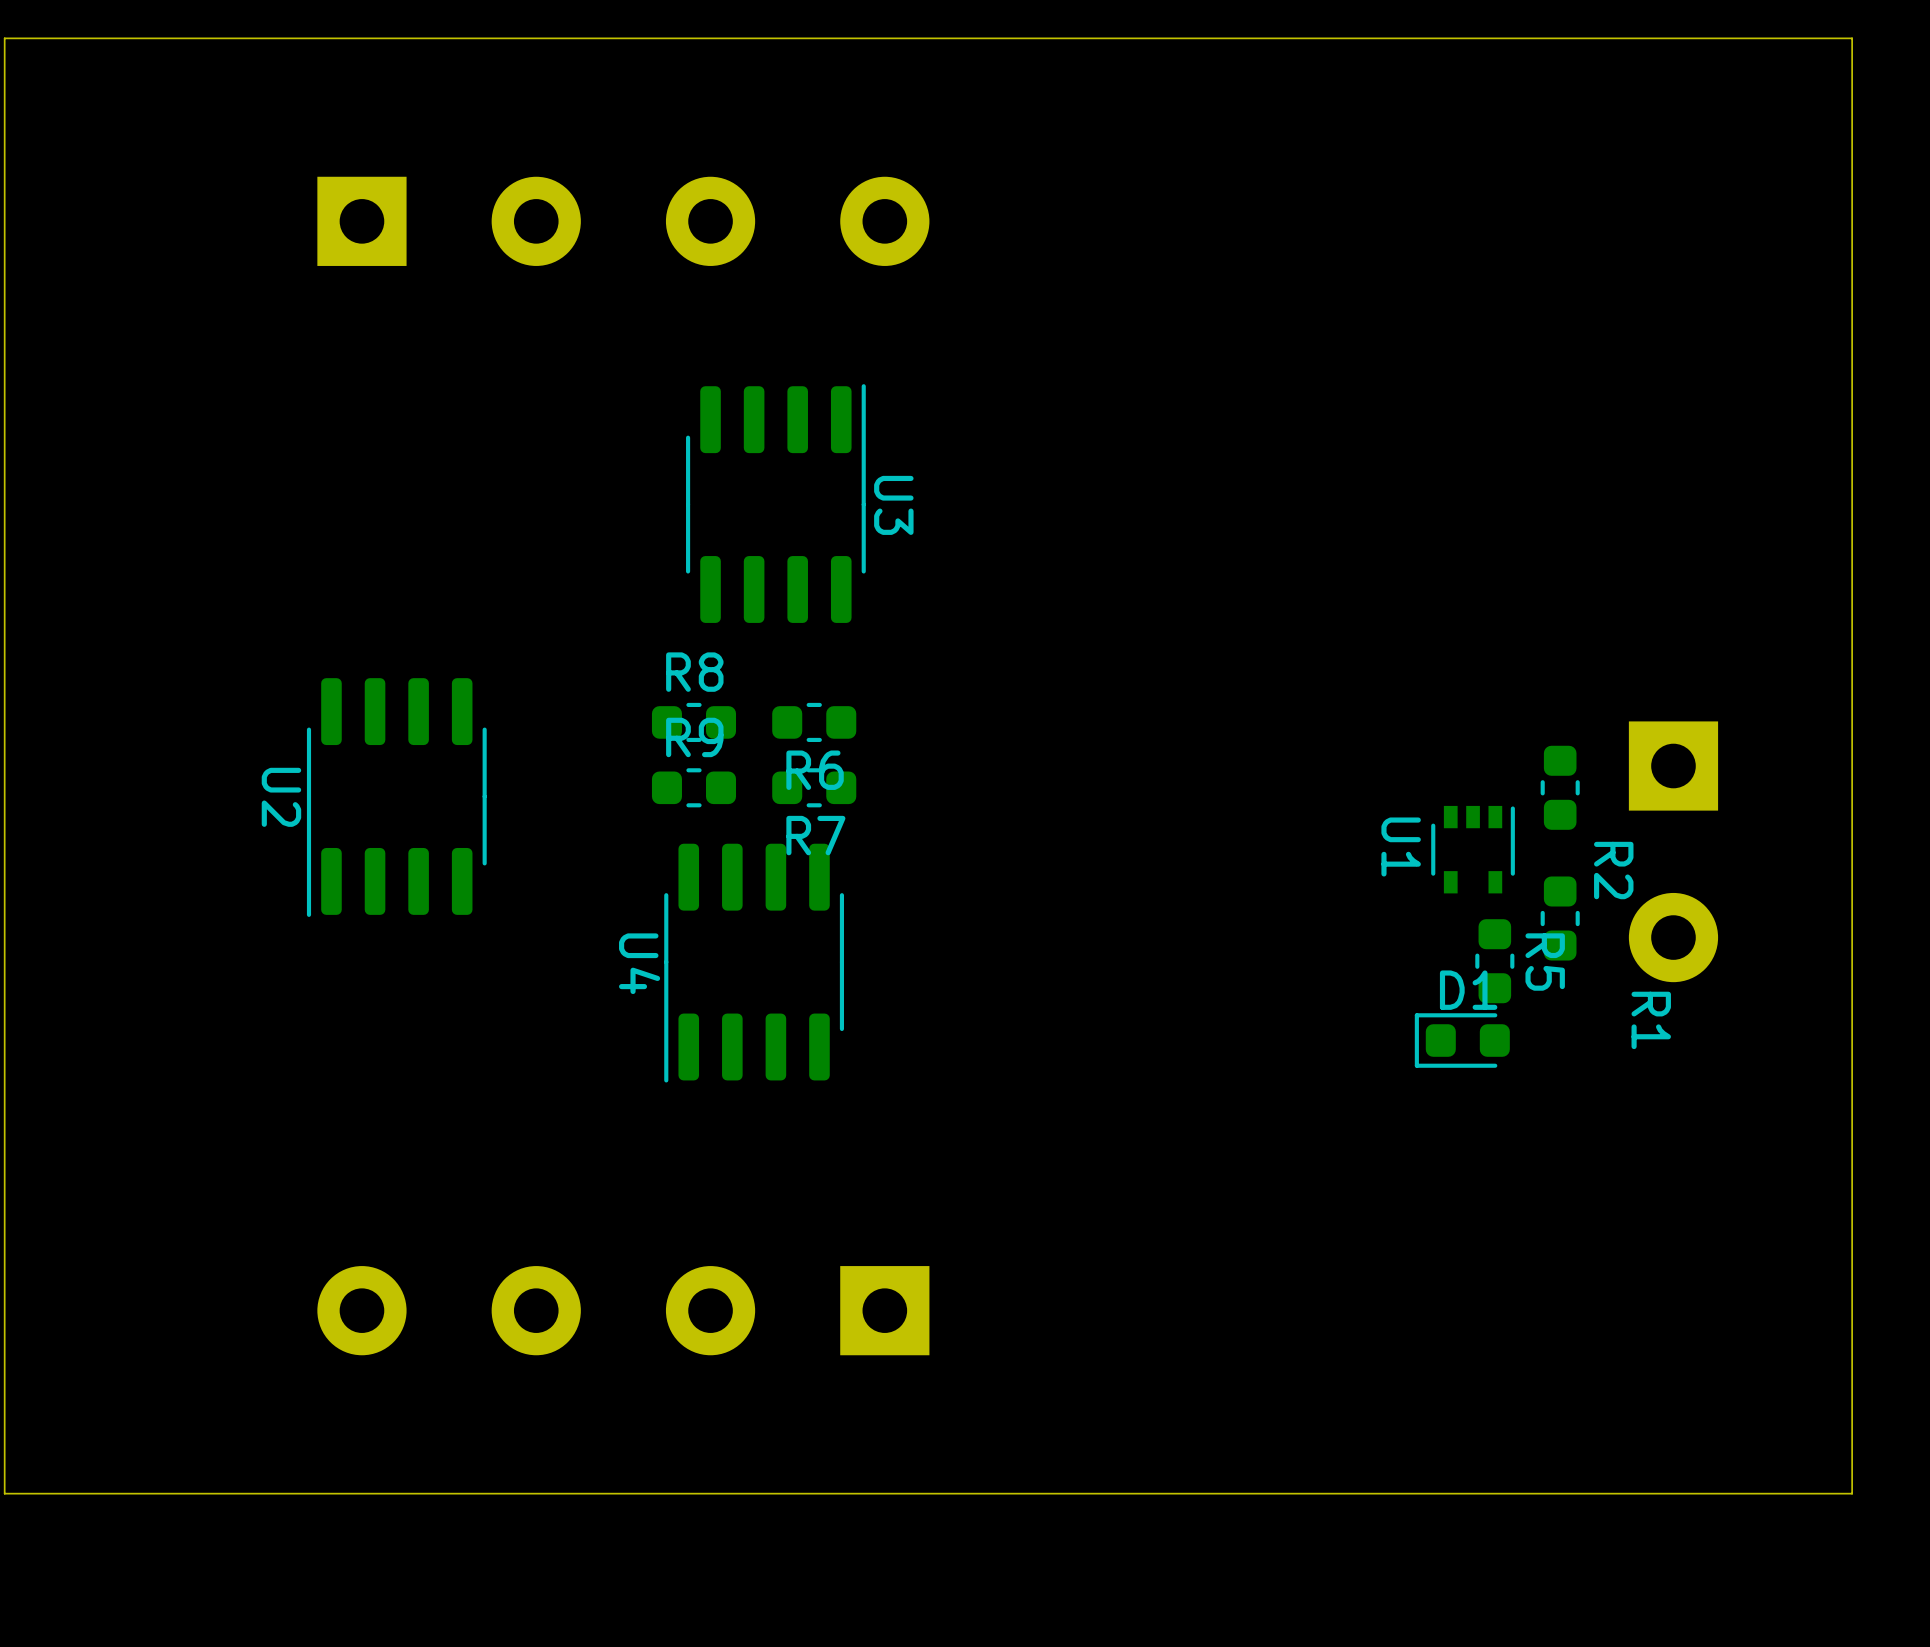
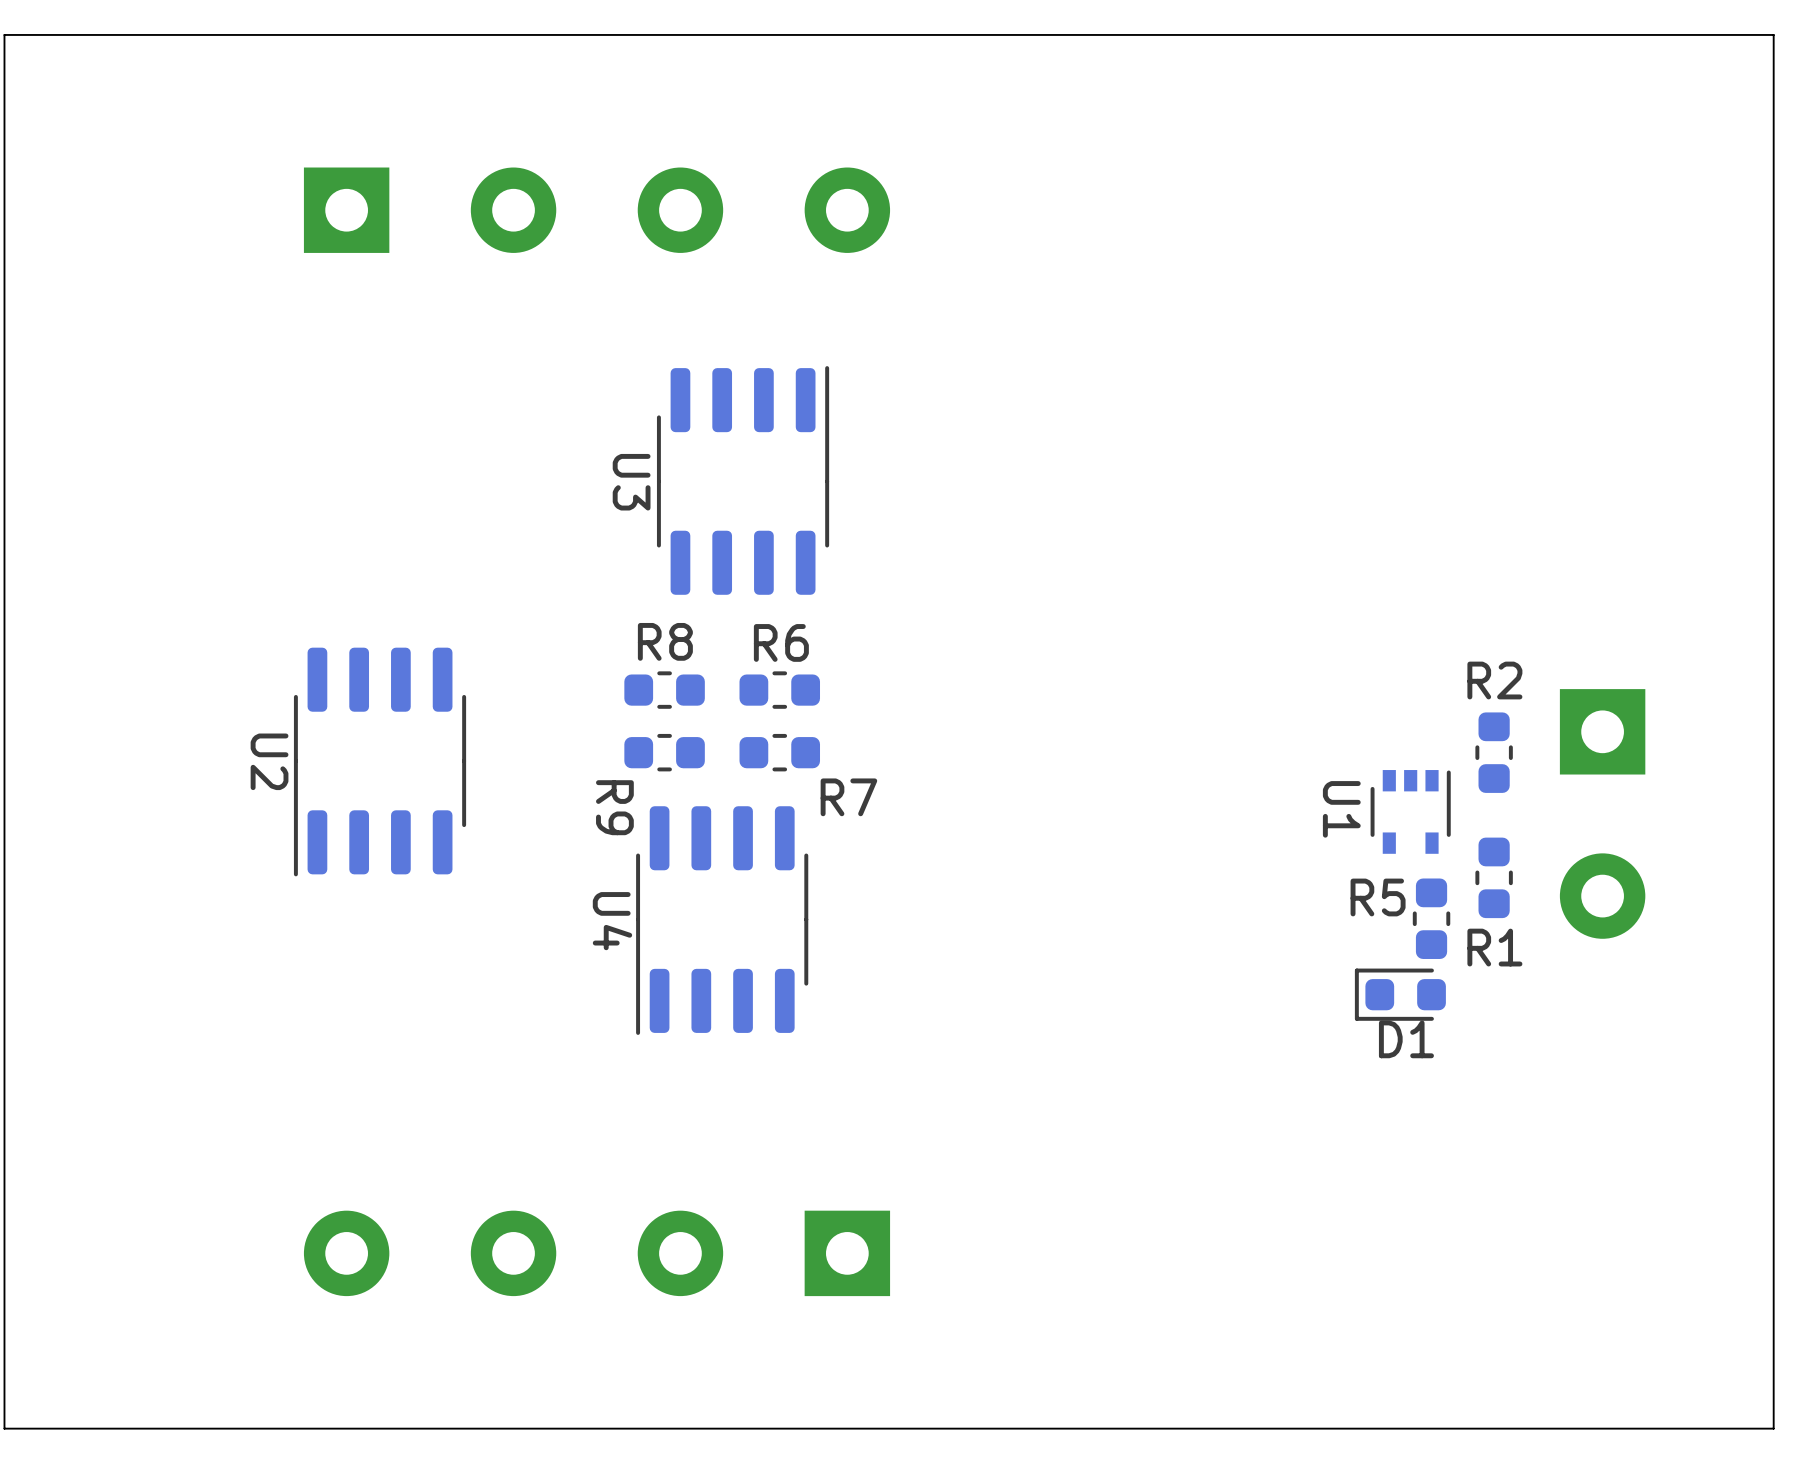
U3 name position: U3 (893, 505) -> U3 (631, 482)
R9 name rotation: 0° (694, 737) -> 90° clockwise (614, 807)
R9 name position: R9 (694, 737) -> R9 (614, 807)
R6 name position: R6 (815, 770) -> R6 (781, 642)
R7 name position: R7 (815, 835) -> R7 (848, 797)
R2 name rotation: 0° (1613, 870) -> 90° counterclockwise (1494, 680)
R2 name position: R2 (1613, 870) -> R2 (1494, 680)
R5 name rotation: 0° (1545, 962) -> 90° counterclockwise (1378, 897)
R5 name position: R5 (1545, 962) -> R5 (1378, 897)
D1 name position: D1 (1468, 990) -> D1 (1406, 1039)
R1 name rotation: 0° (1651, 1020) -> 90° counterclockwise (1494, 947)
R1 name position: R1 (1651, 1020) -> R1 (1494, 947)

